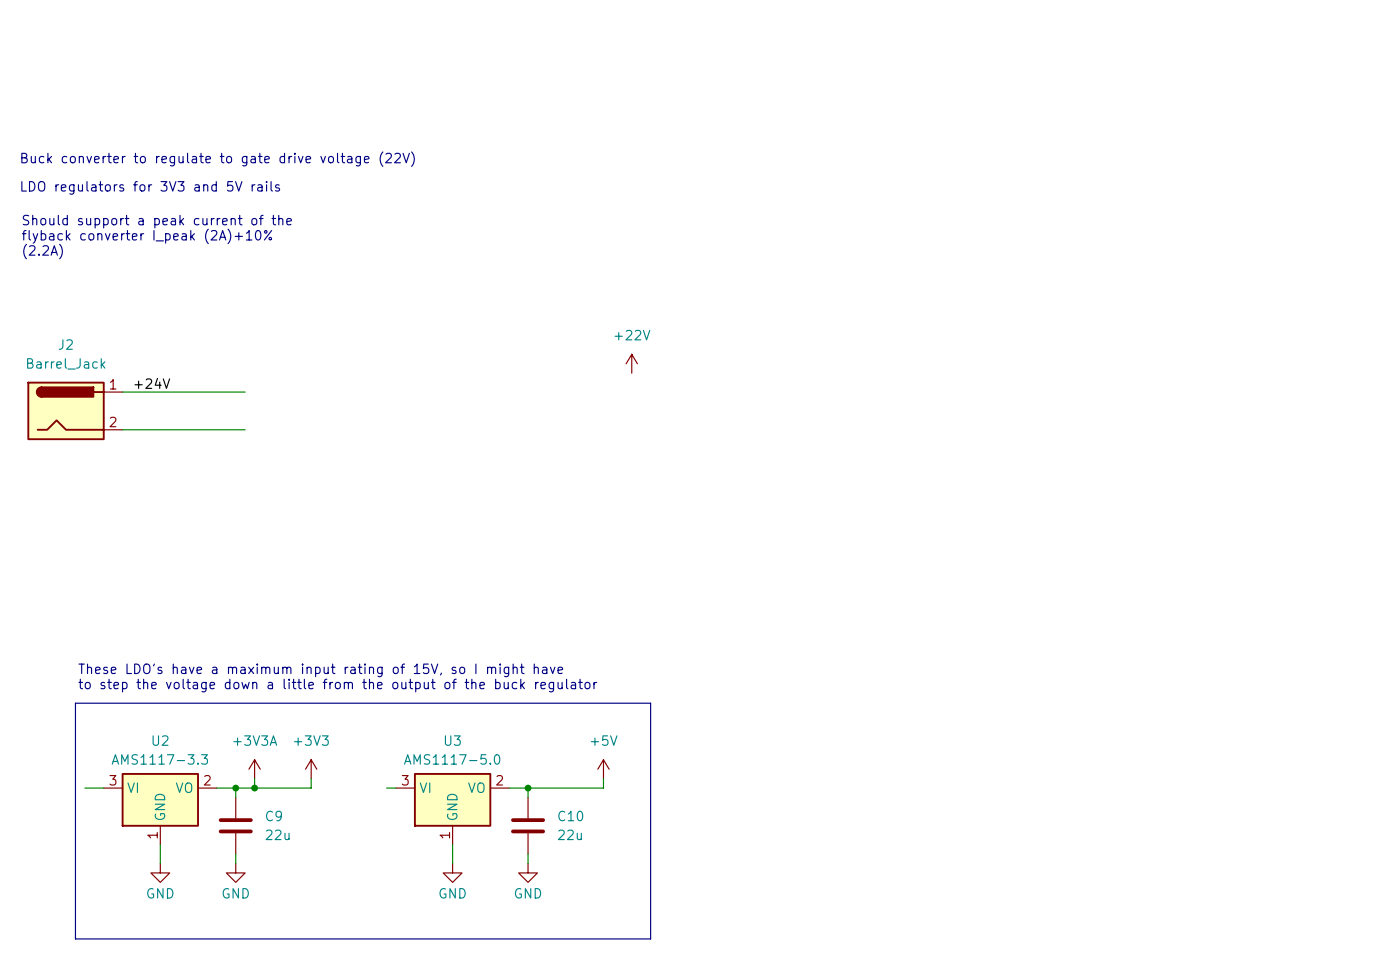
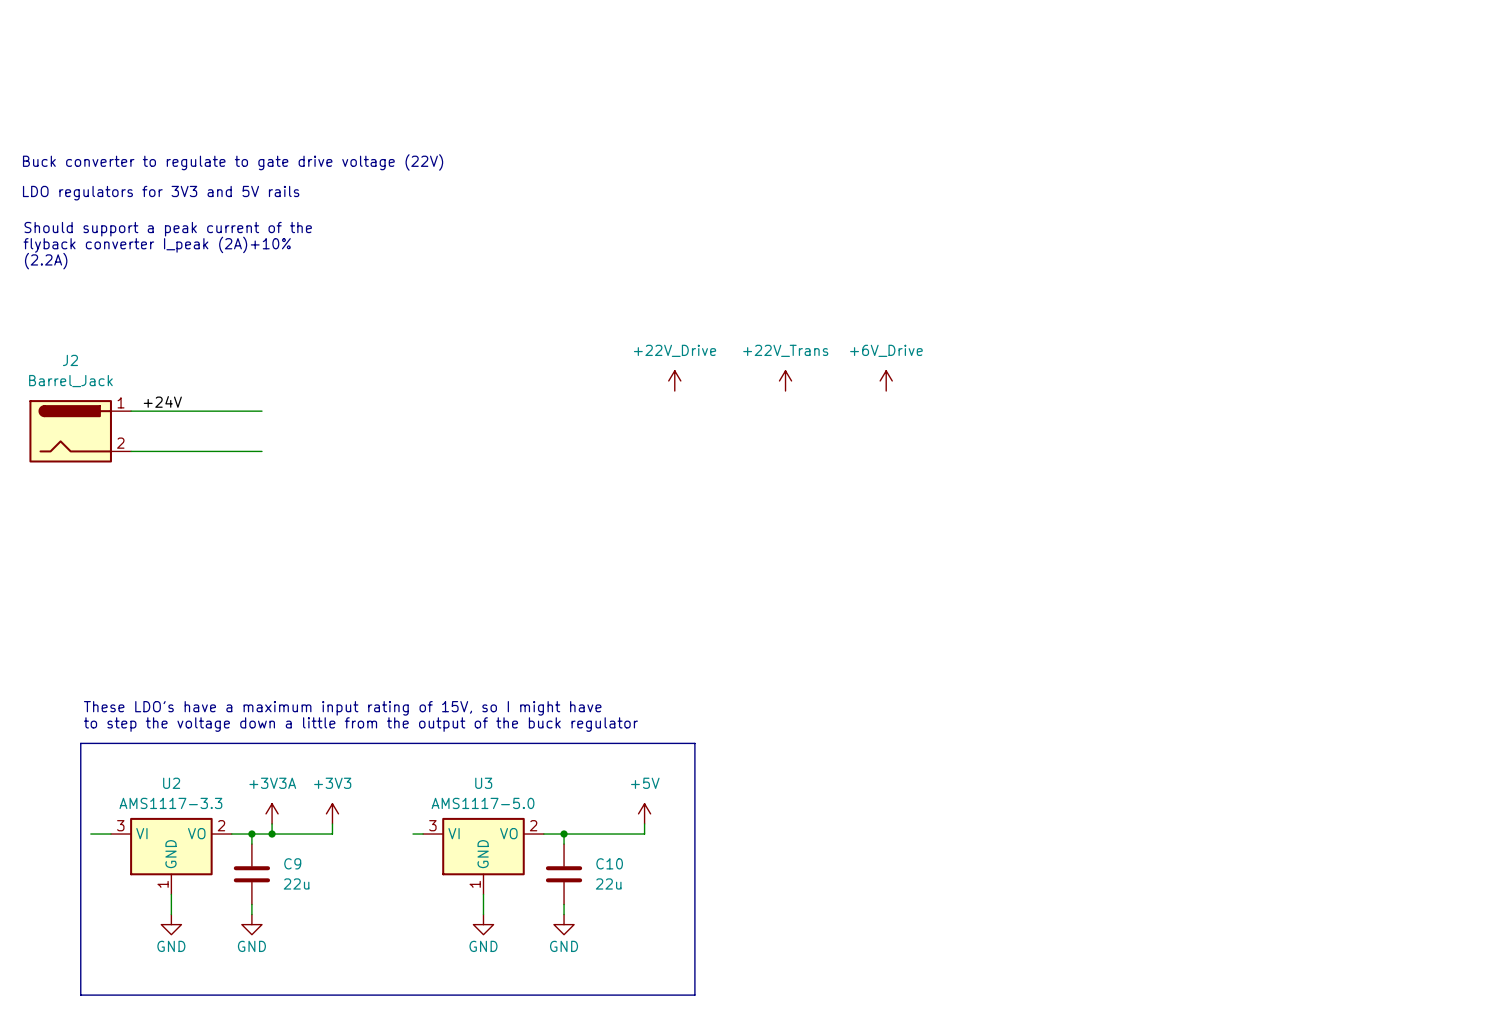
power symbol: +22V (631, 363) -> +22V_Drive (674, 380)
power symbol: none -> +22V_Trans (785, 380)
power symbol: none -> +6V_Drive (886, 380)

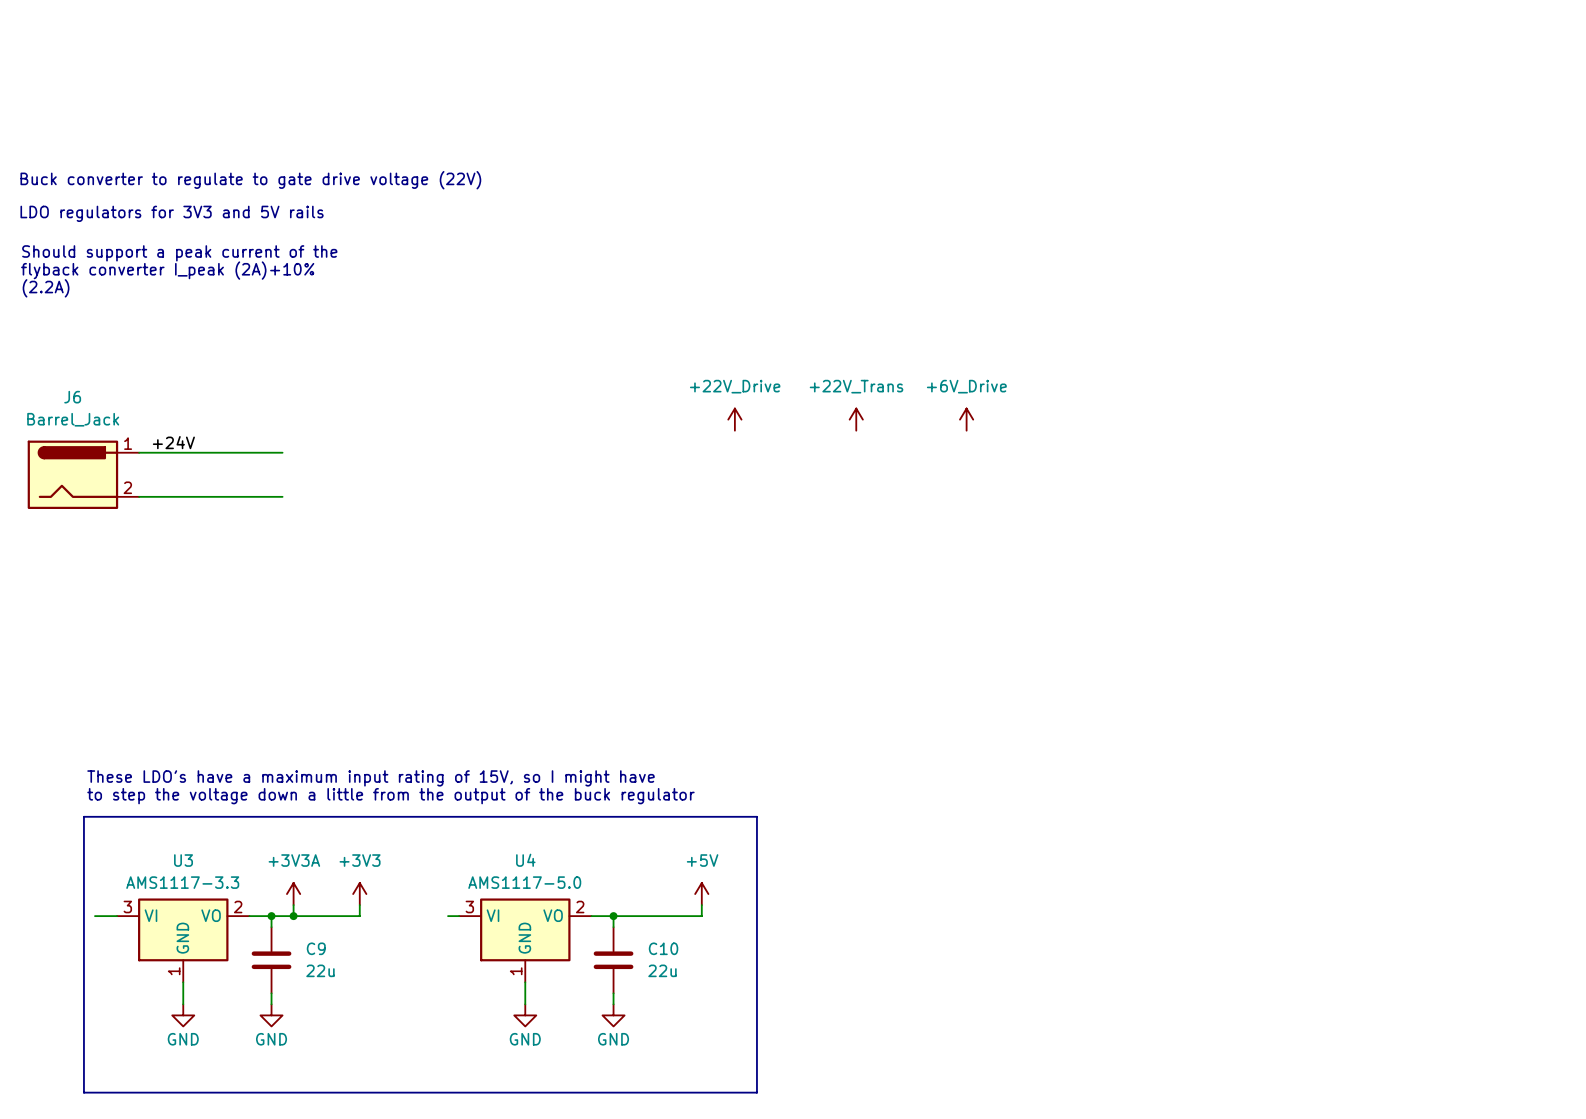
J2 name: J2 (70, 360) -> J6 (72, 397)
U2 name: U2 (171, 783) -> U3 (183, 860)
U3 name: U3 (483, 783) -> U4 (525, 860)

